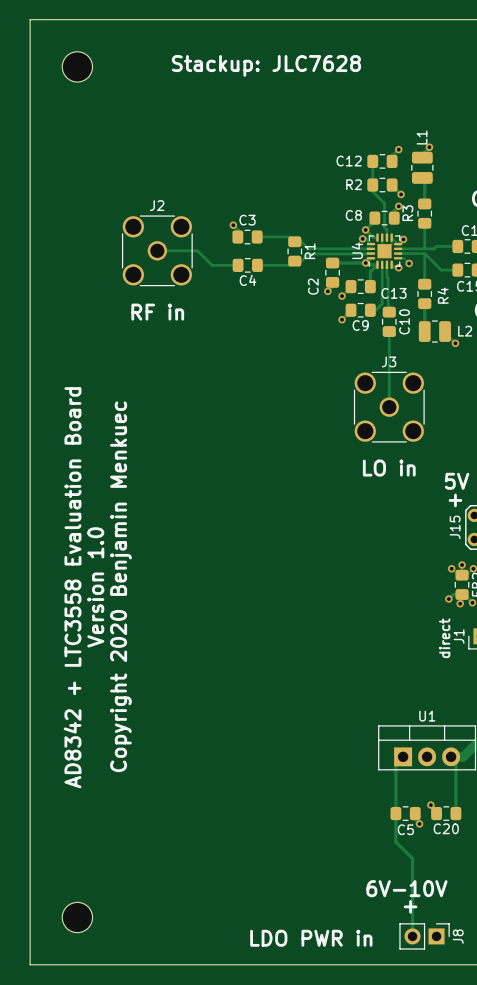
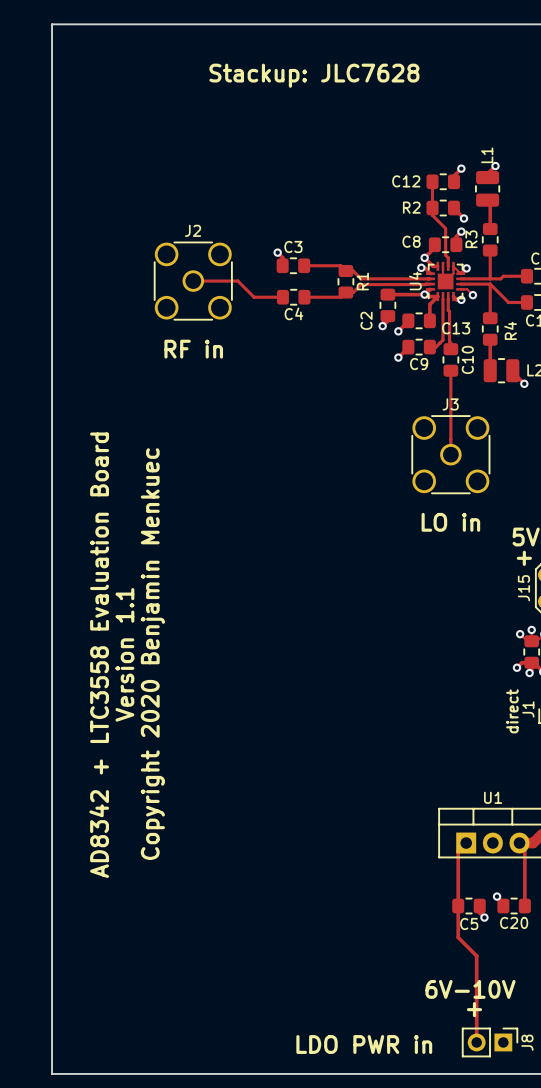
part: (77, 66) -> none
text: Version 1.0 (95, 587) -> Version 1.1 (124, 654)
part: (77, 917) -> none

